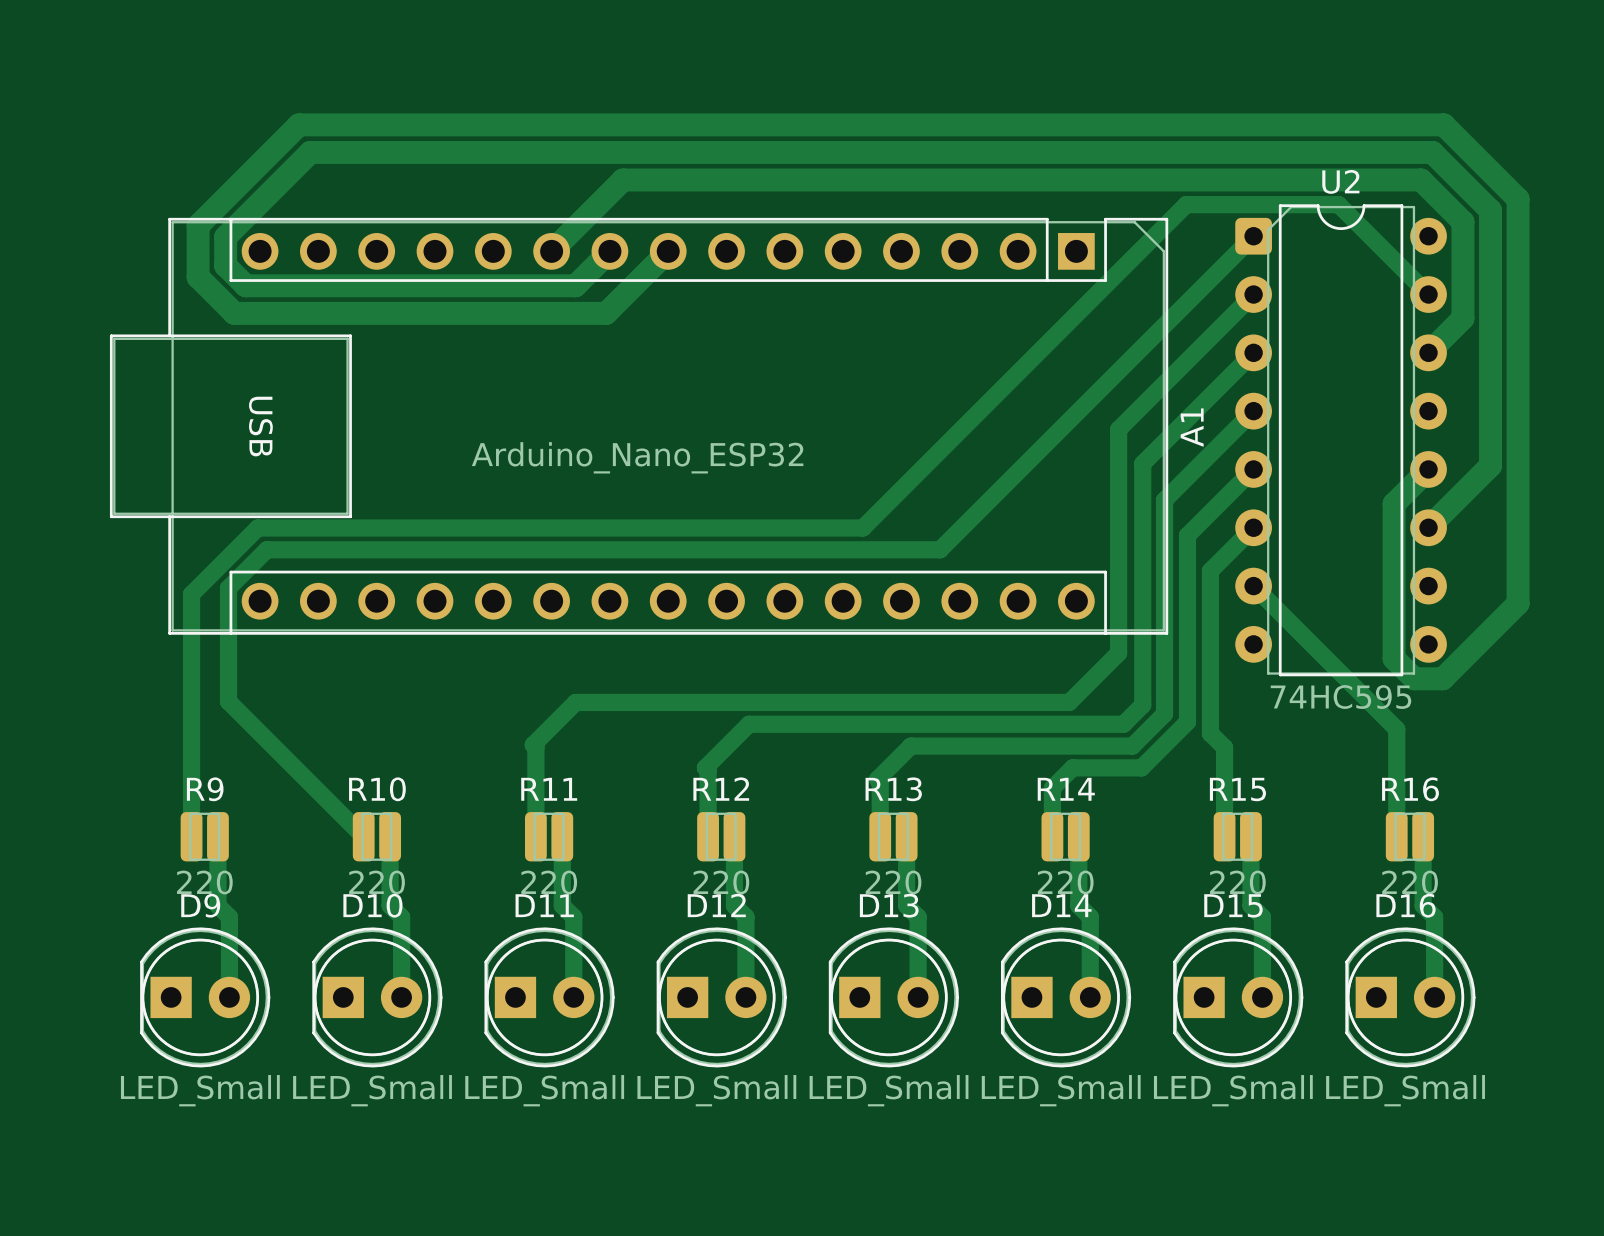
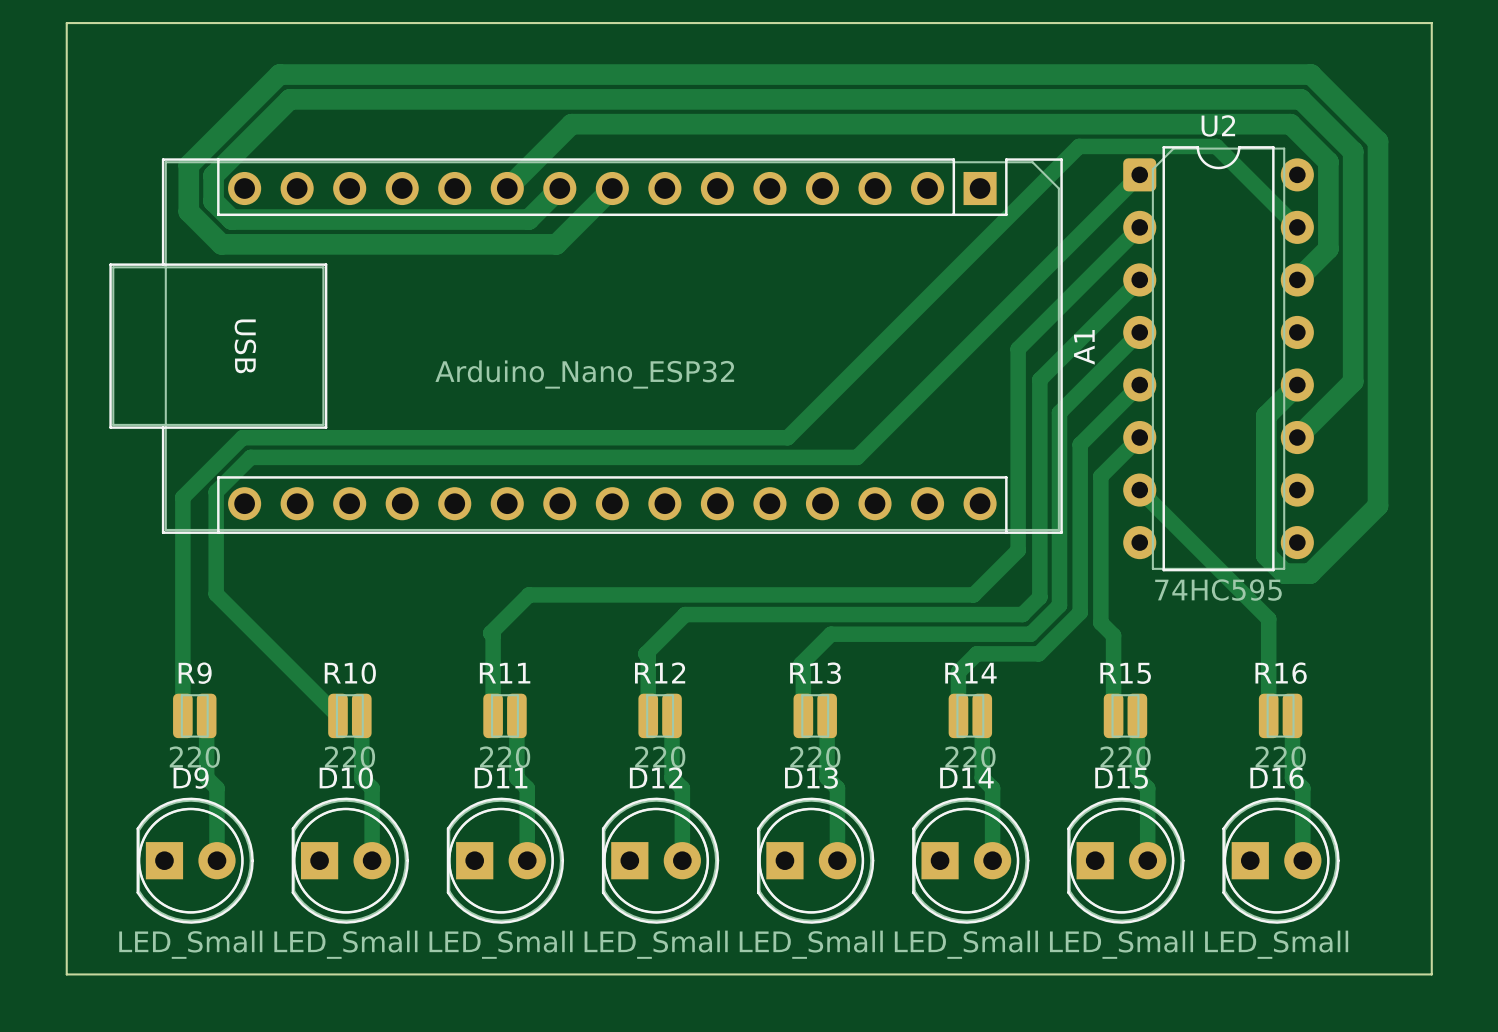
board edge: none -> (66, 23) (1431, 23) (1431, 974) (66, 974) (66, 23)

